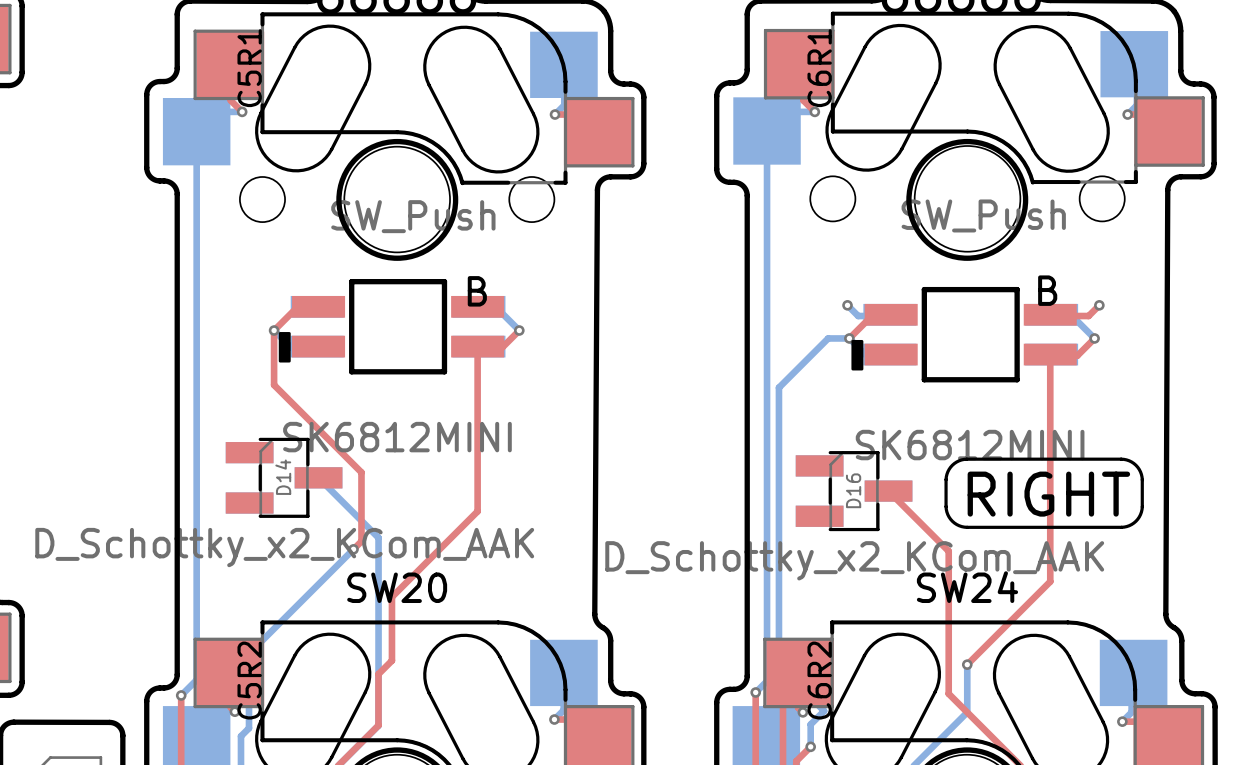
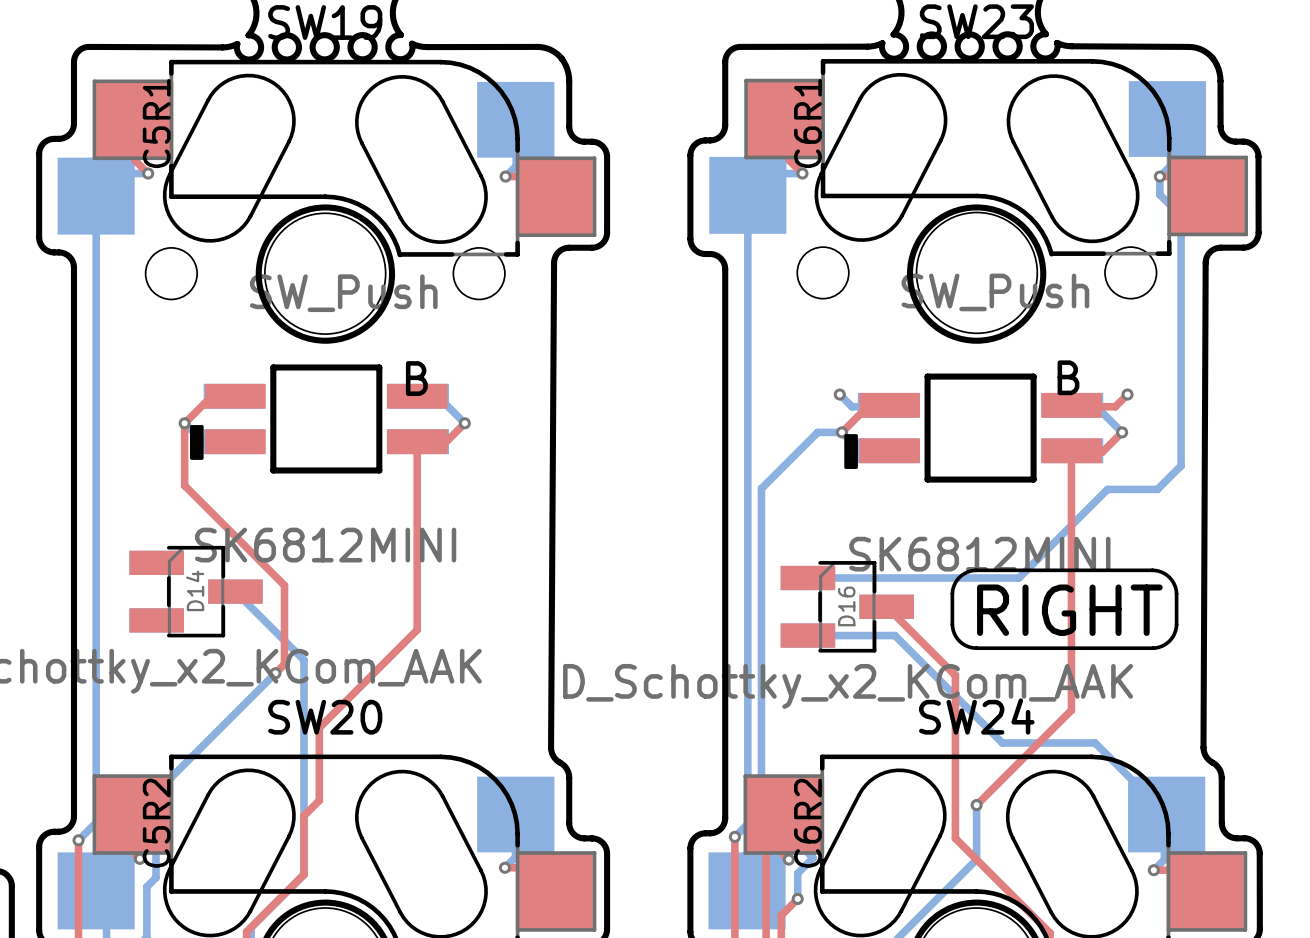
bottom track: none -> (1159, 176) (1159, 194) (1181, 215) (1181, 465) (1157, 489) (1107, 489) (1018, 578) (807, 578)
bottom track: none -> (807, 635) (894, 635) (1002, 742) (1095, 742) (1166, 814)

